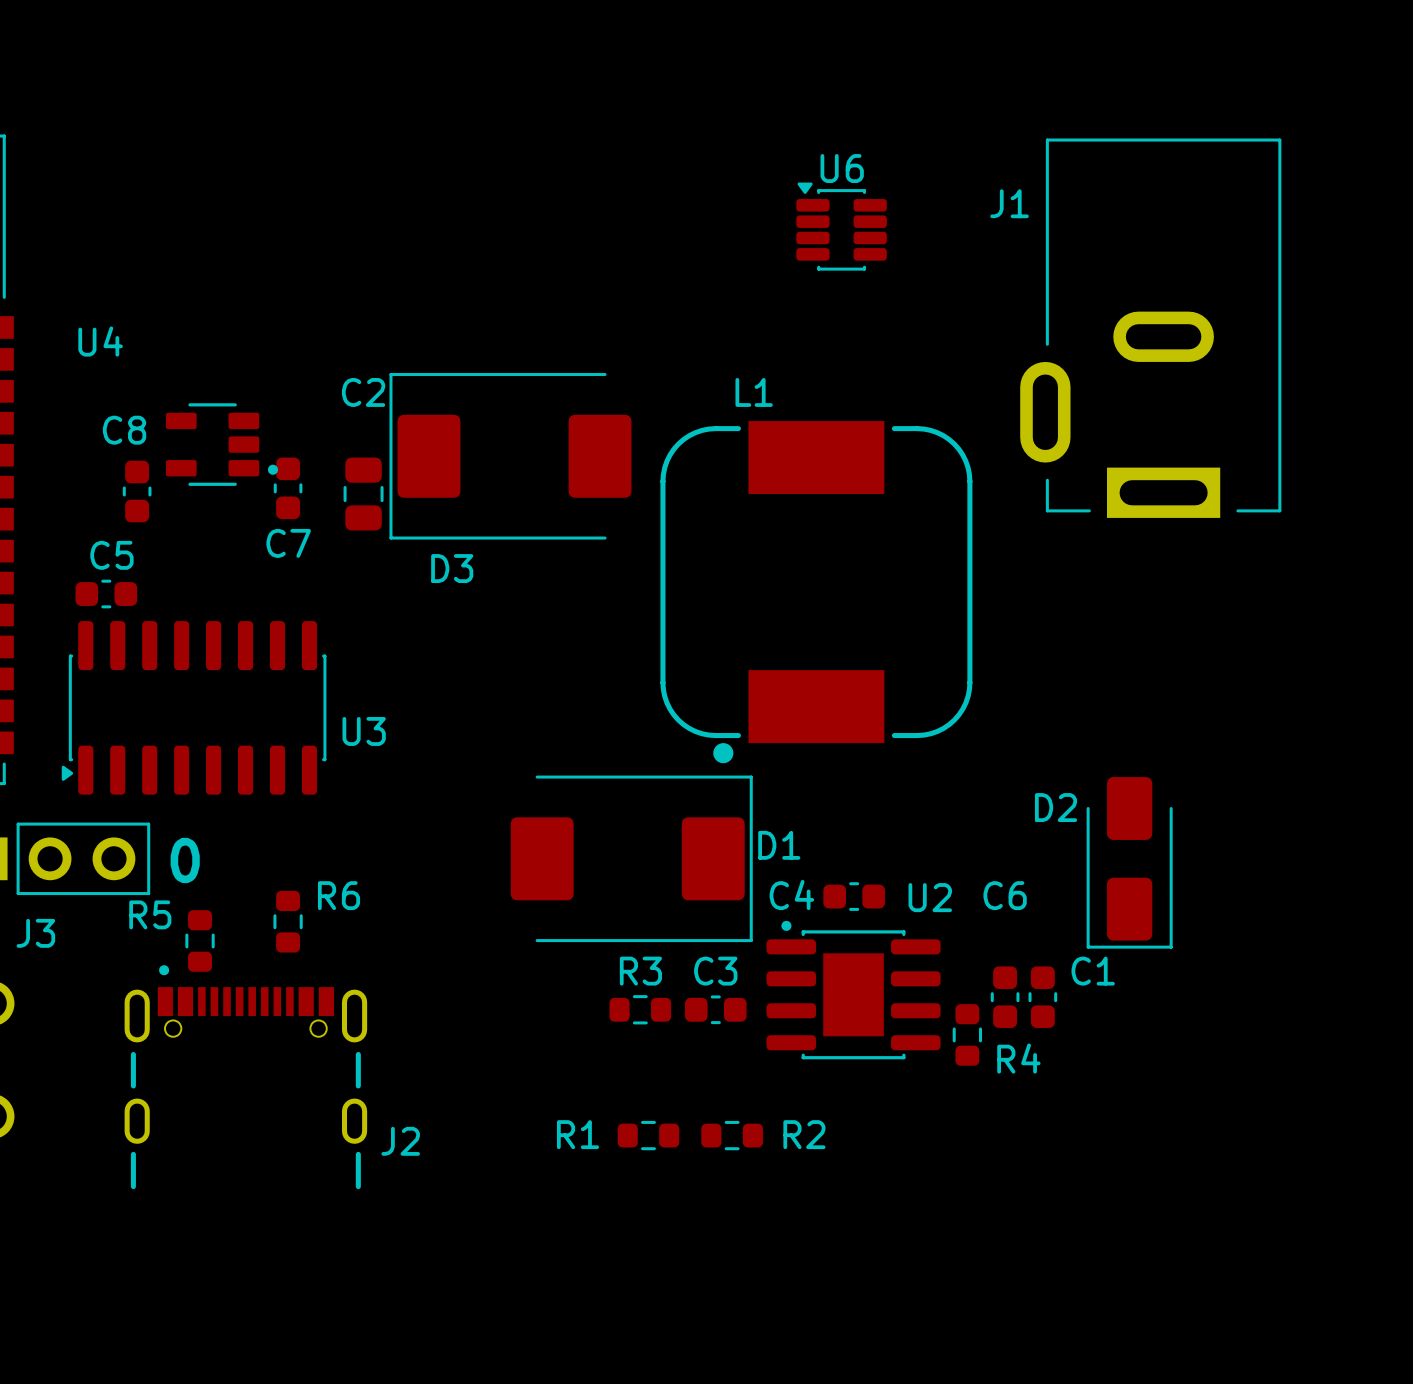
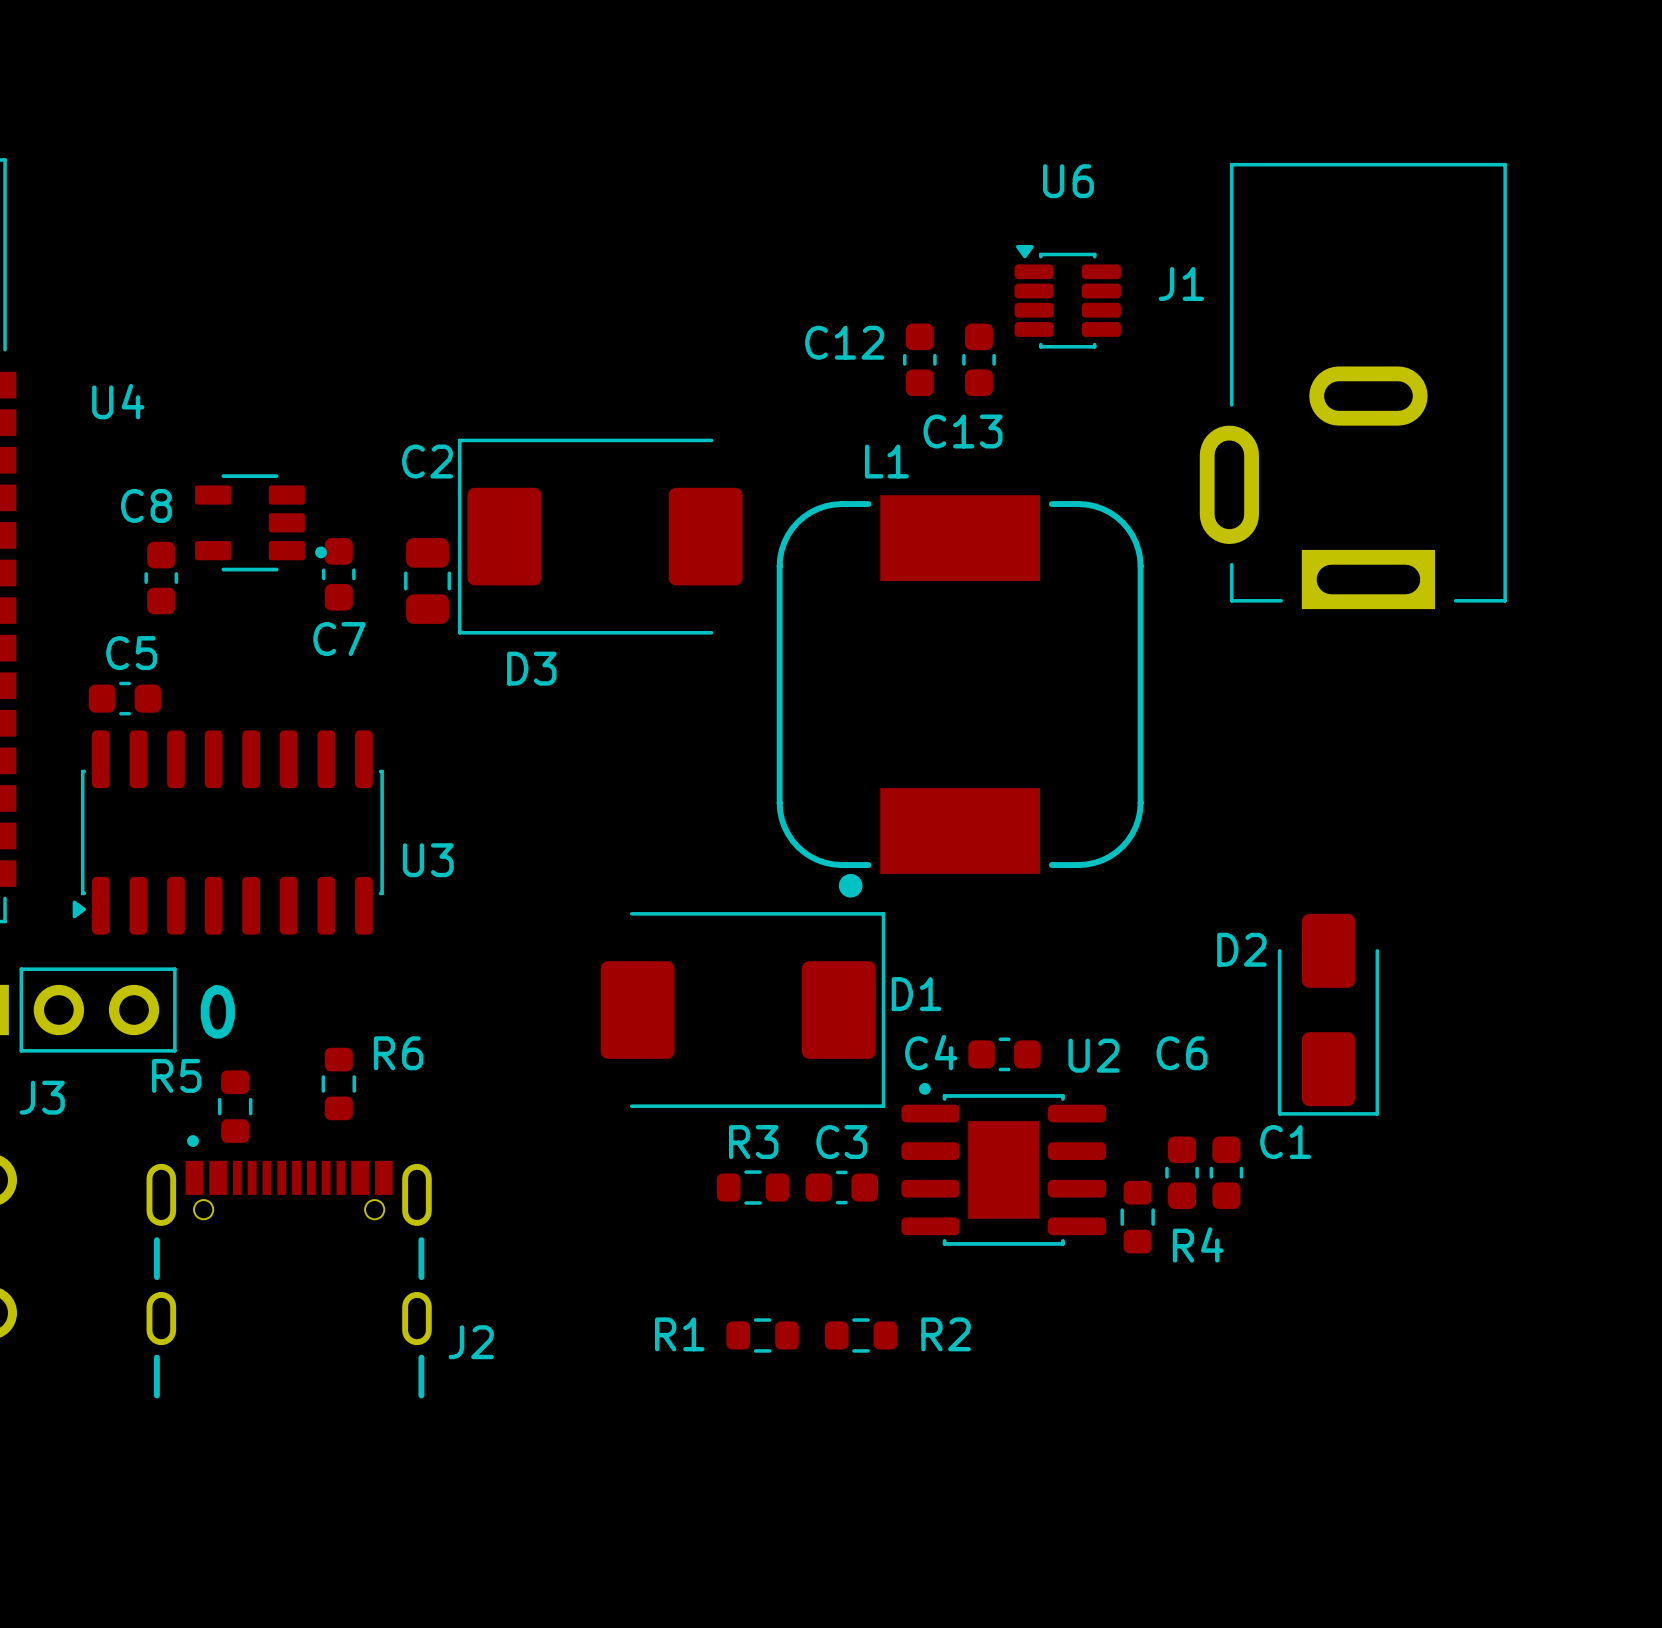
U6 name position: U6 (842, 168) -> U6 (1068, 181)
J1 name position: J1 (1009, 203) -> J1 (1181, 284)
U6 position: (841, 226) -> (1067, 296)
C12: none -> (919, 359)
C13: none -> (979, 359)

